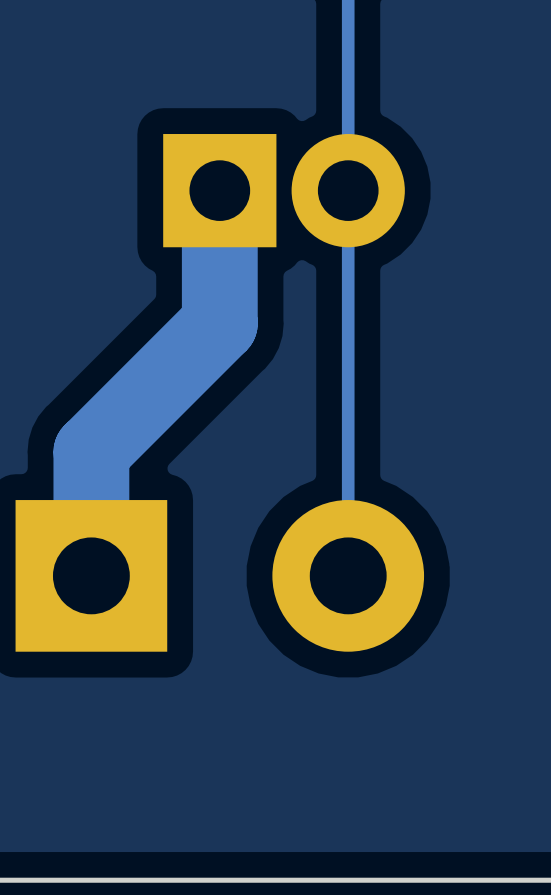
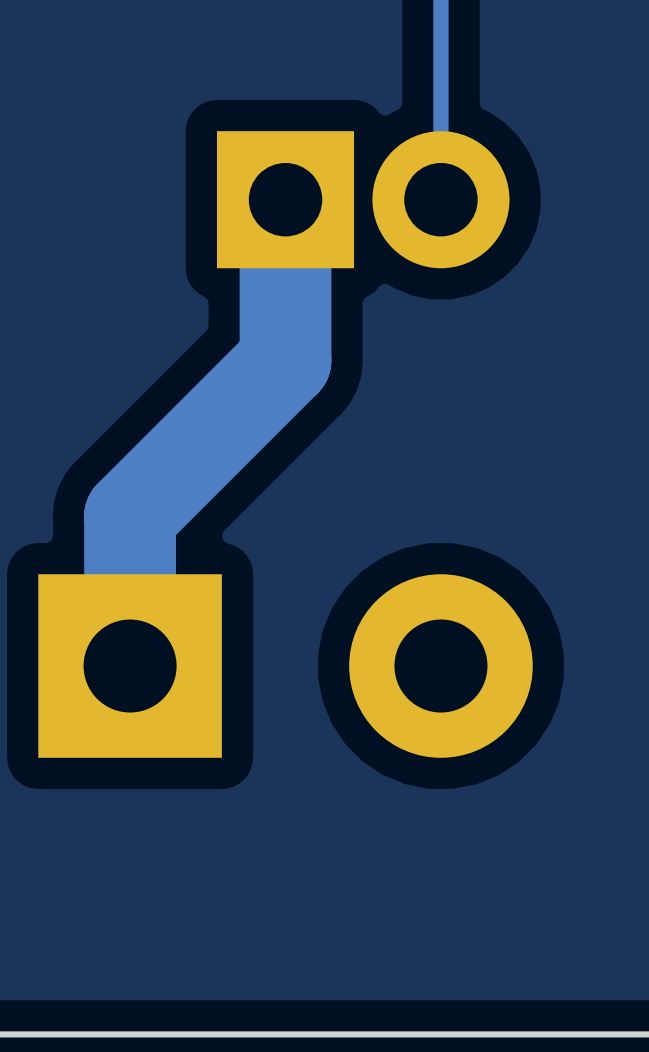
track: (348, 190) (348, 575) -> none

